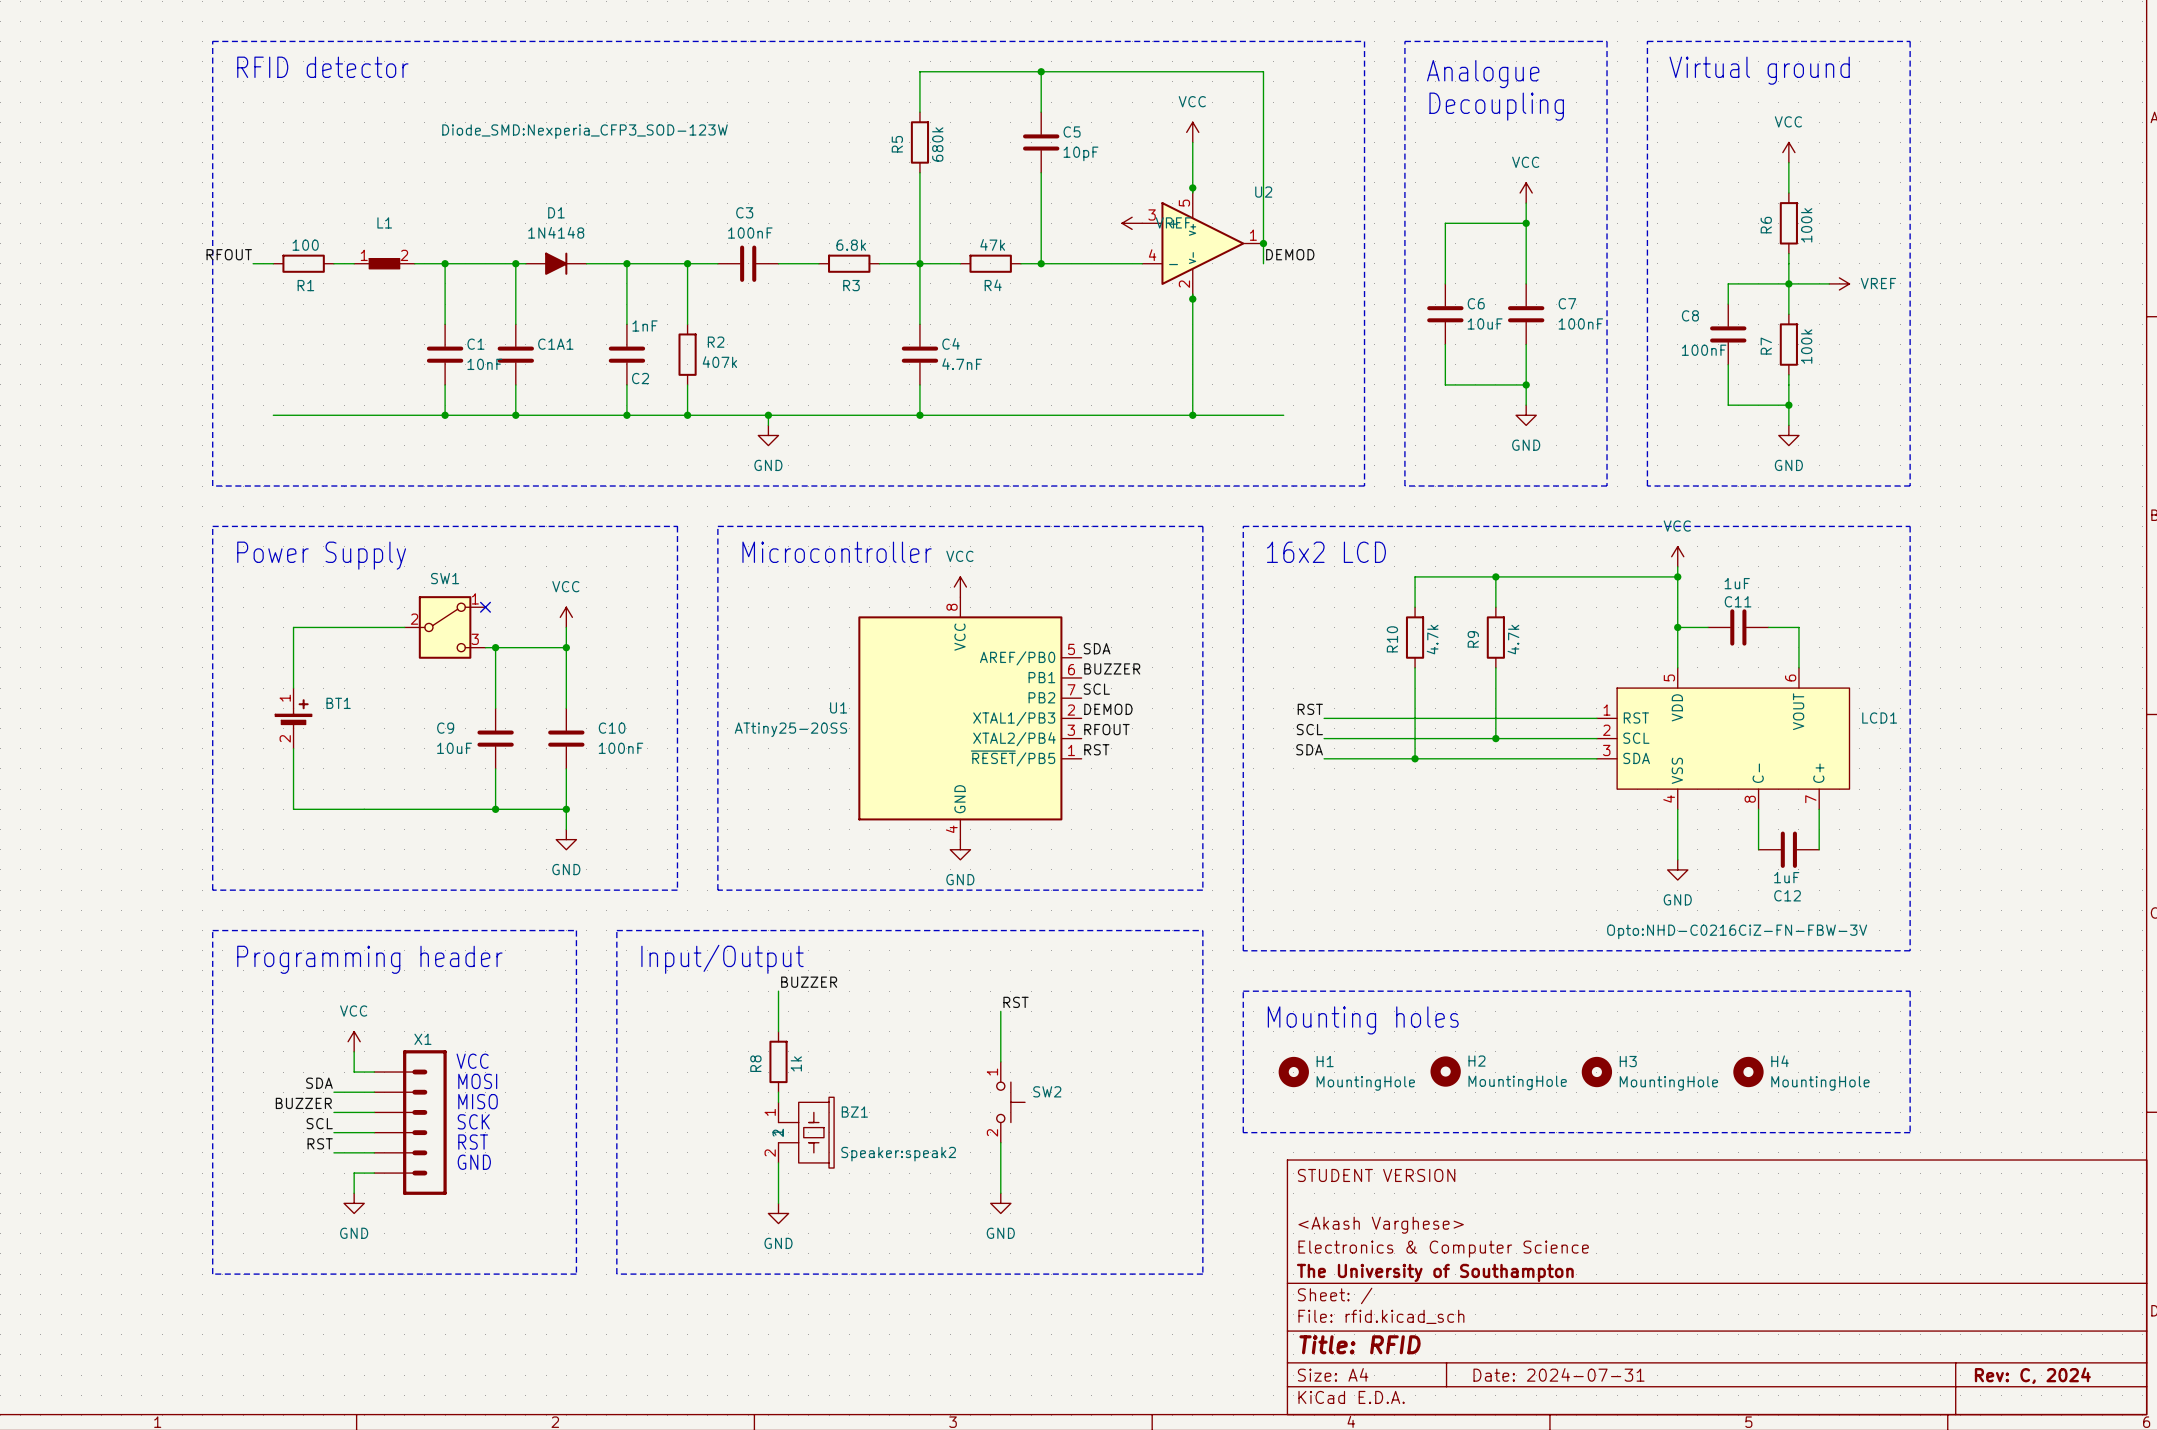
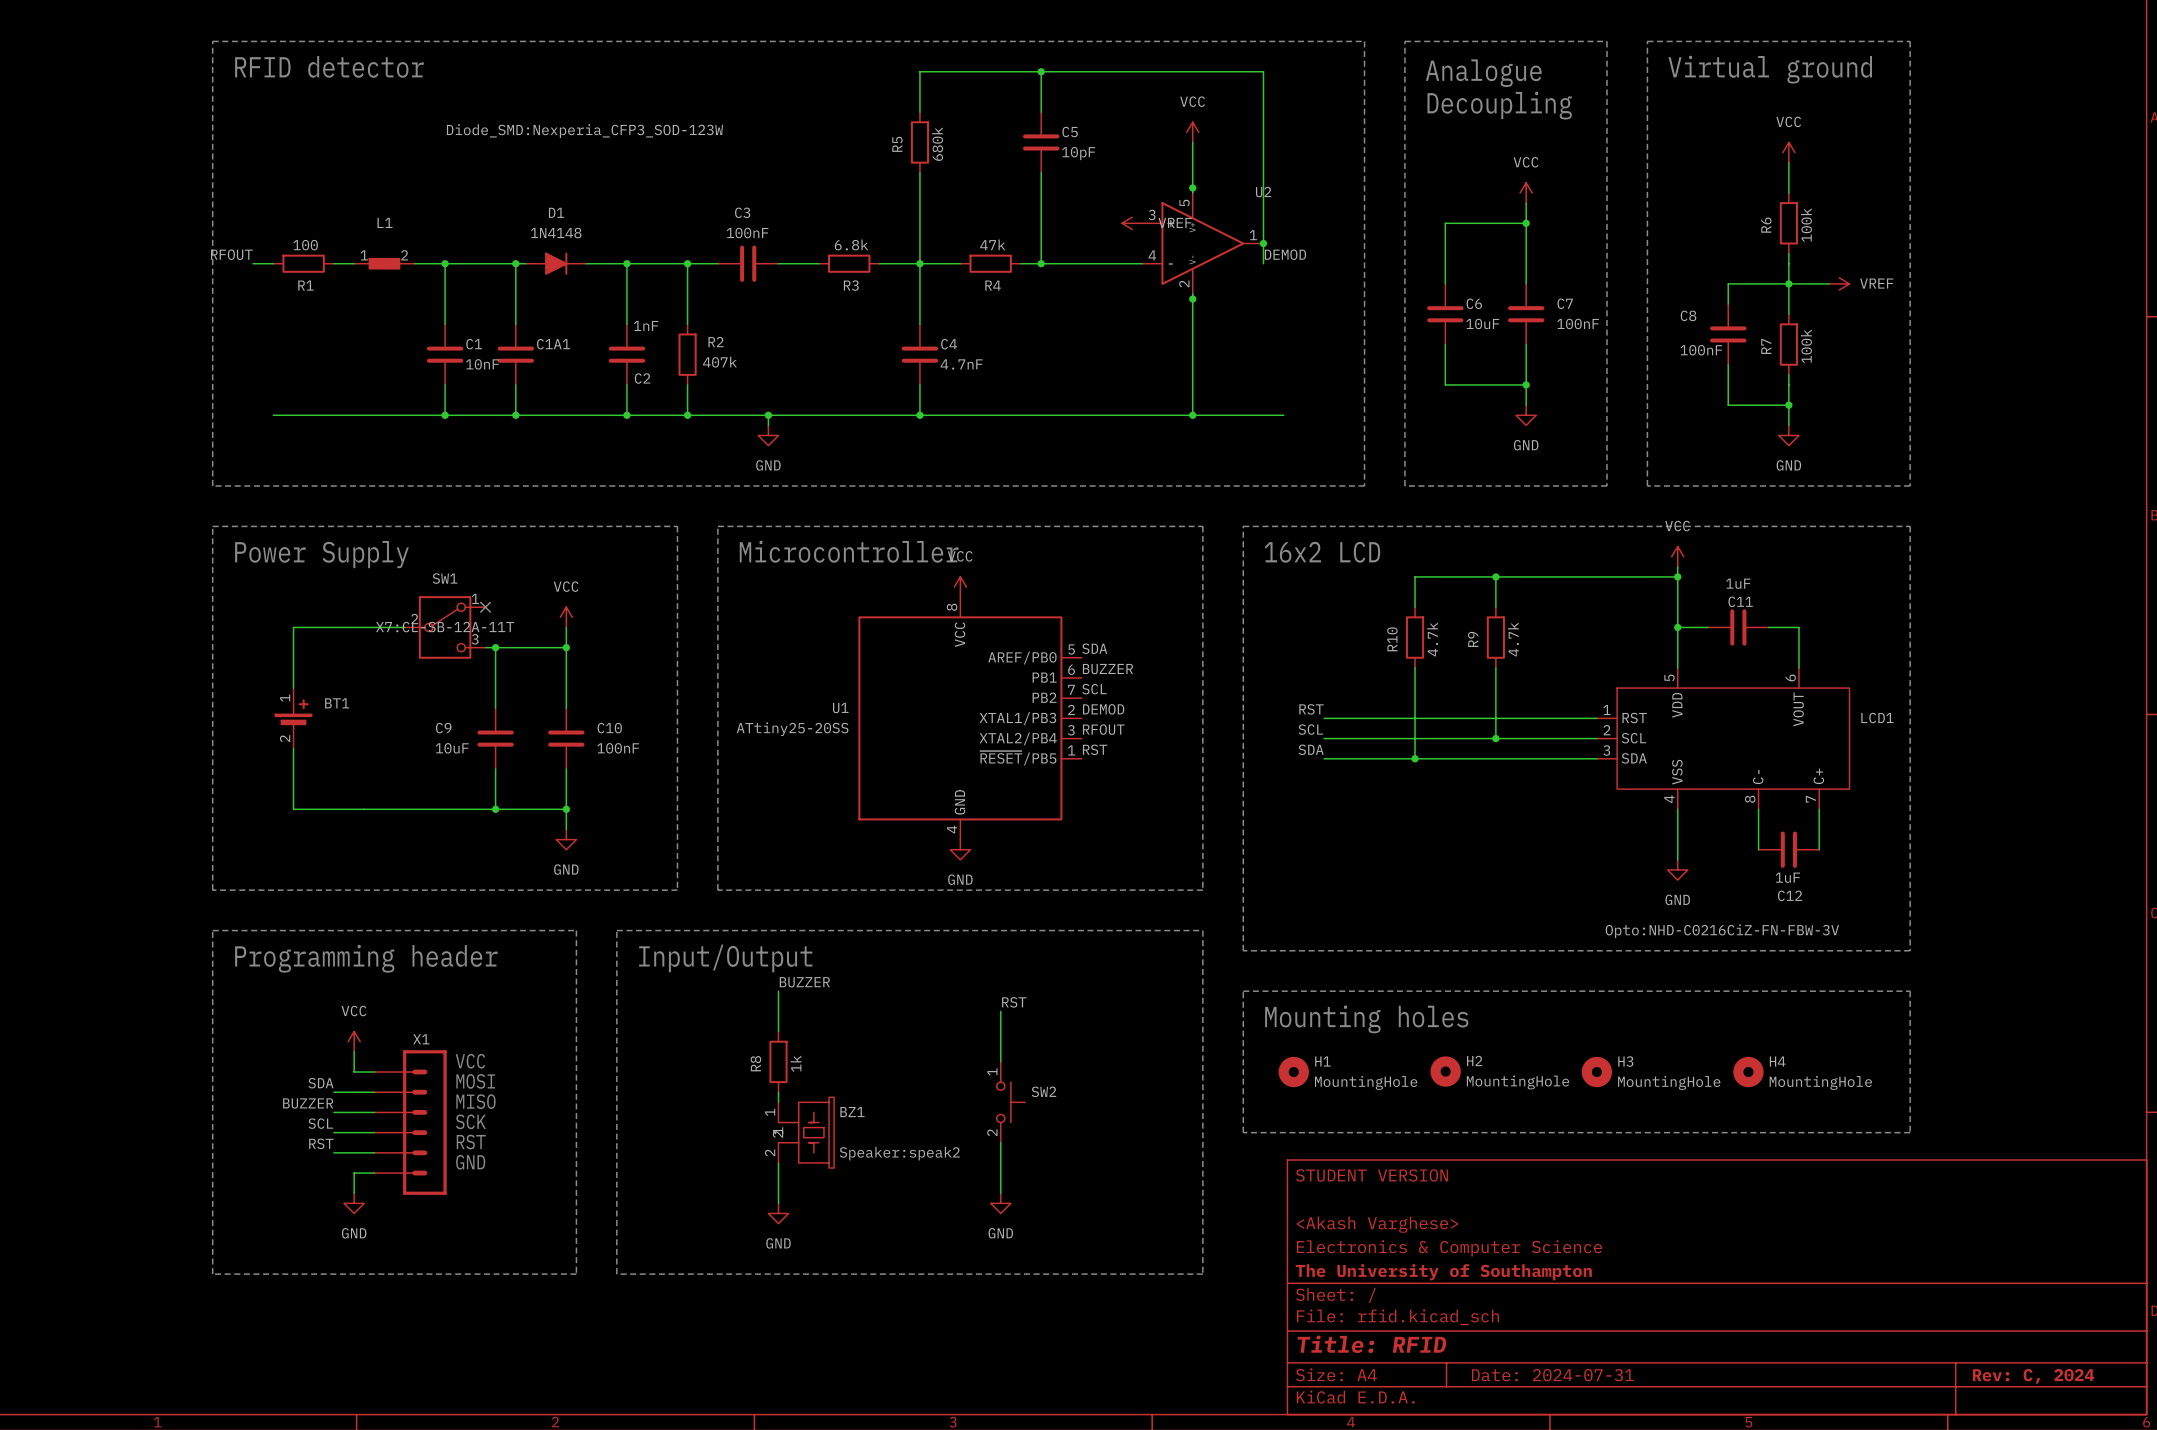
SW1 text: none -> X7:CL-SB-12A-11T (445, 627)

